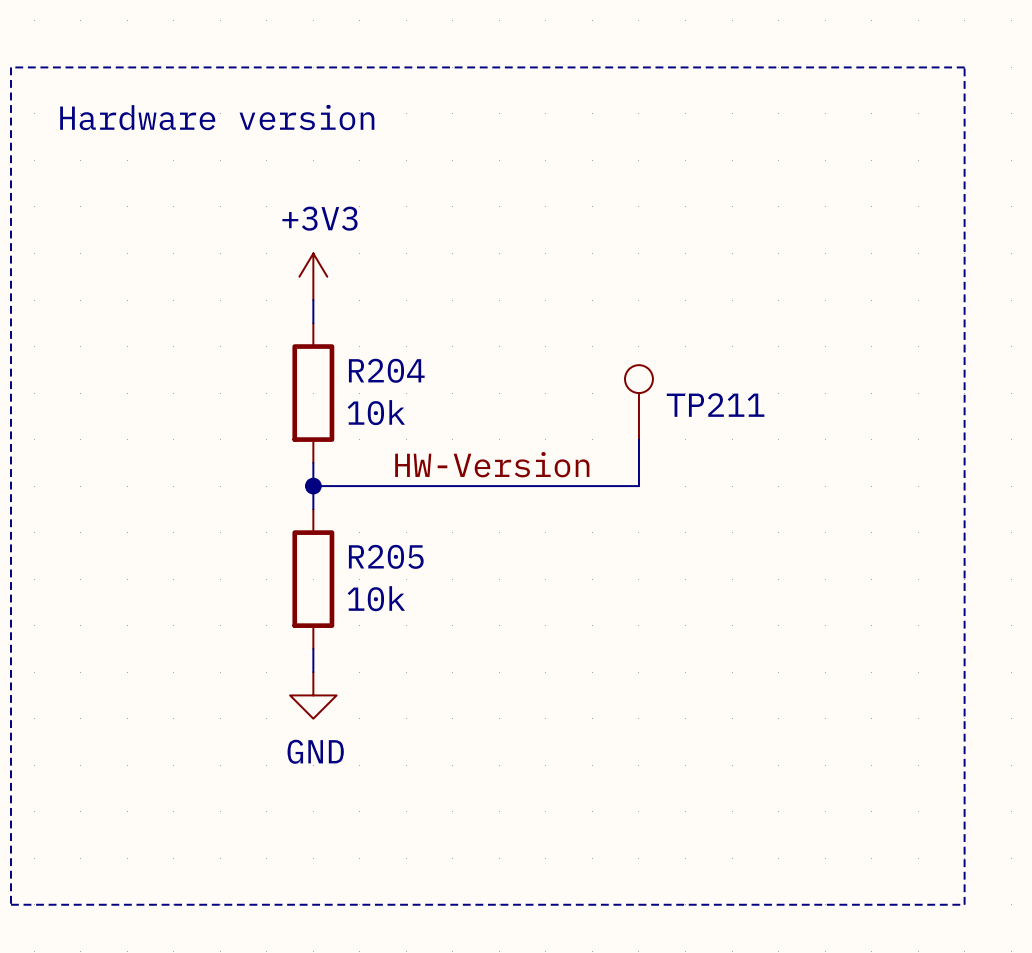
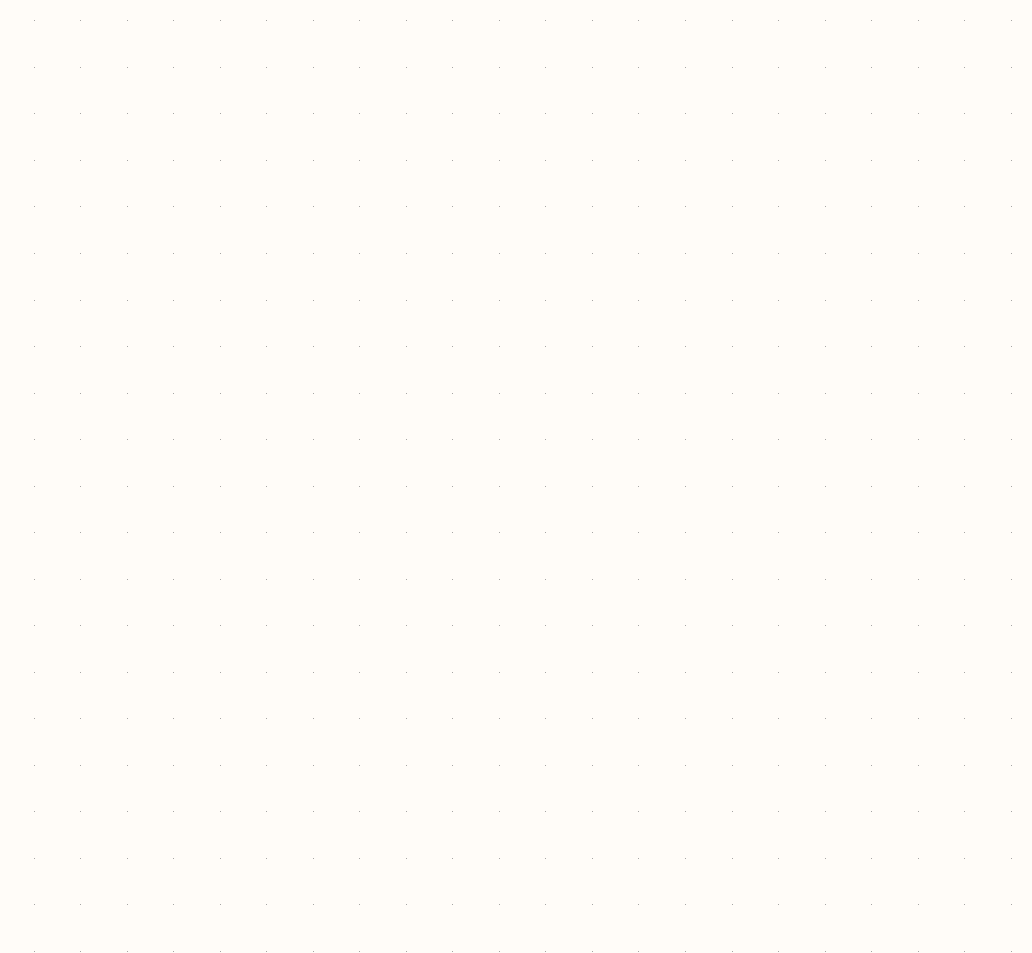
line: (10, 67) (10, 904) (964, 904) (964, 67) (10, 67) -> none
text: Hardware version (217, 117) -> none
power symbol: +3V3 (313, 276) -> none
wire: (313, 300) (313, 323) -> none
R204: 10k (313, 393) -> none
TP211: (638, 402) -> none
wire: (638, 439) (638, 486) (313, 486) -> none
wire: (313, 462) (313, 509) -> none
label: HW-Version (492, 464) -> none
junction: (313, 486) -> none
R205: 10k (313, 579) -> none
wire: (313, 648) (313, 672) -> none
power symbol: GND (313, 695) -> none

